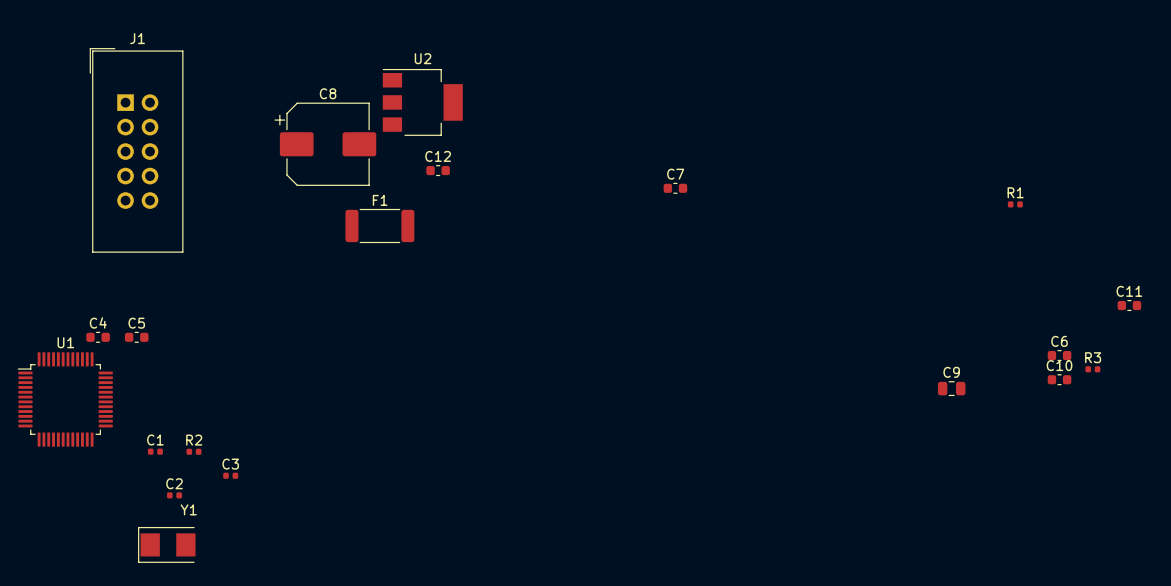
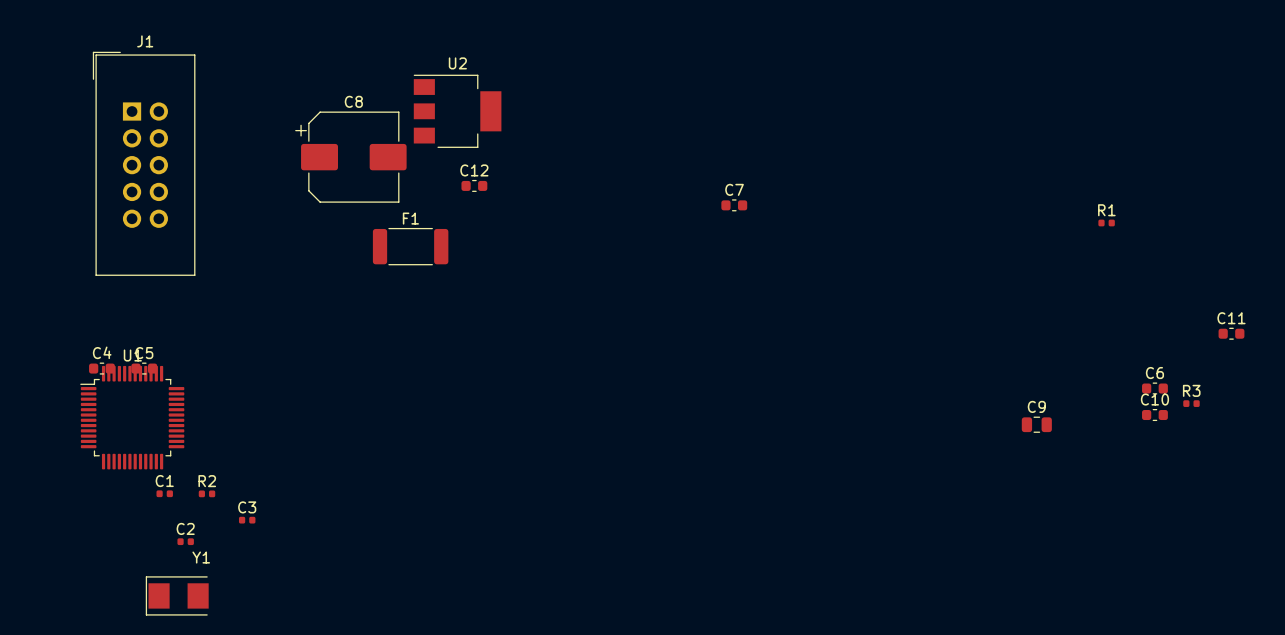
U1 position: (65, 399) -> (132, 417)

